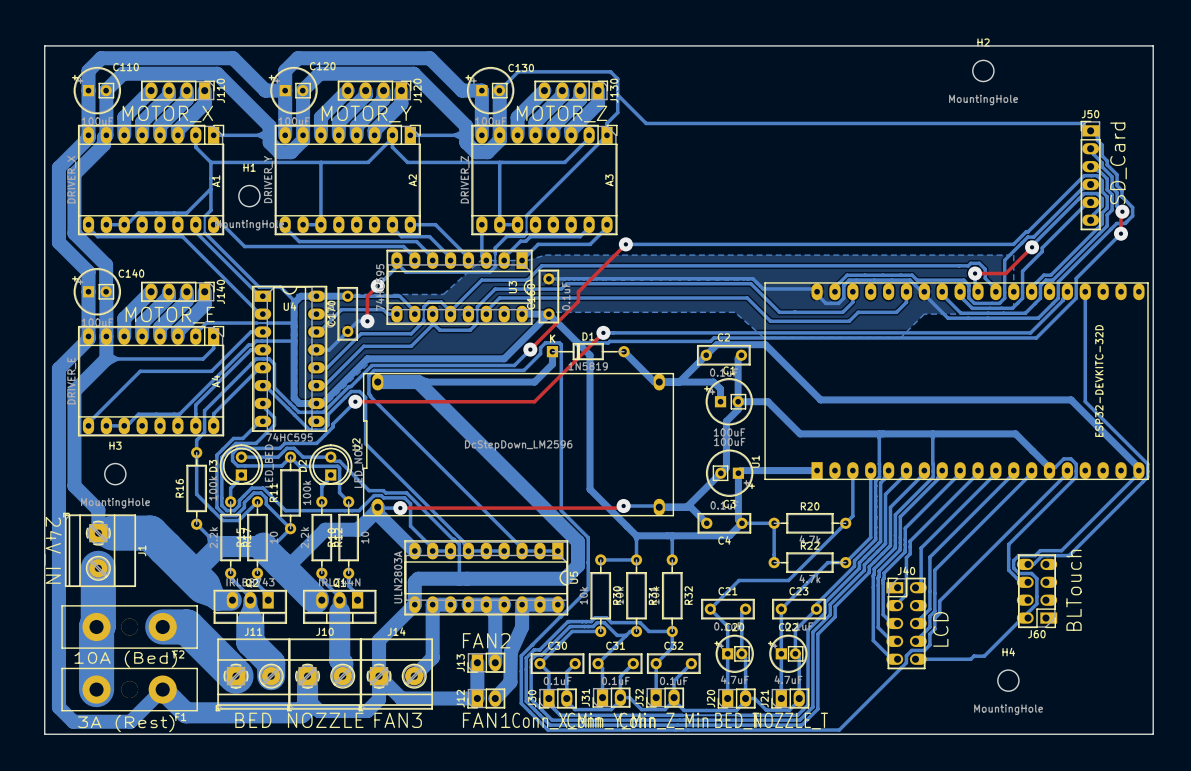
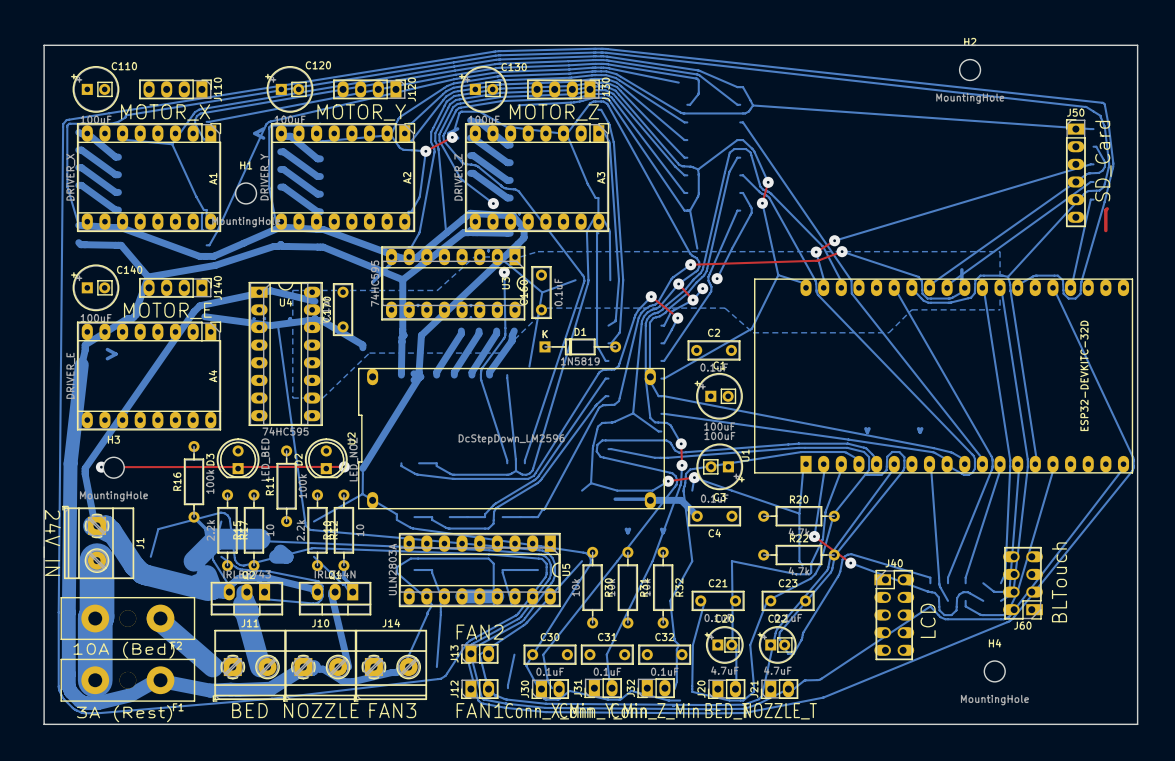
bottom track: none -> (568, 61) (496, 63) (200, 113) (196, 116) (195, 124) (203, 139) (206, 139)
bottom track: none -> (568, 61) (606, 60) (697, 74) (737, 104) (740, 104)
bottom track: none -> (453, 62) (126, 115) (118, 121) (111, 123) (69, 123) (67, 125) (67, 185) (78, 225) (121, 227) (199, 256) (213, 256) (280, 227) (323, 229) (401, 258) (416, 257) (470, 213) (513, 215) (523, 228) (523, 238) (421, 335) (419, 377) (362, 468) (362, 494)
bottom track: none -> (453, 62) (498, 55) (606, 52) (1085, 106)
bottom track: none -> (678, 82) (603, 67) (499, 72) (454, 79) (269, 121) (217, 231) (209, 245) (206, 245)
bottom track: (151, 90) (124, 117) (124, 135) -> none
bottom track: (168, 90) (168, 95) (142, 122) (142, 135) -> none
bottom track: (186, 90) (186, 99) (160, 126) (160, 135) -> none
bottom track: (204, 90) (204, 103) (177, 130) (177, 135) -> none
bottom track: (285, 90) (265, 90) (233, 58) (101, 58) (88, 70) (88, 138) (58, 167) (58, 242) (88, 272) (88, 339) (58, 368) (58, 707) (73, 721) (130, 721) (162, 689) (185, 712) (301, 712) (307, 706) (307, 676) (307, 699) (319, 711) (367, 711) (379, 699) (379, 640) (414, 604) (414, 582) (418, 578) (564, 578) (578, 565) (578, 541) (418, 382) -> none
bottom track: (347, 90) (320, 117) (320, 135) -> none
bottom track: (365, 90) (365, 95) (338, 122) (338, 135) -> none
bottom track: (383, 90) (383, 99) (356, 126) (356, 135) -> none
bottom track: (401, 90) (401, 103) (374, 130) (374, 135) -> none
bottom track: (544, 90) (517, 117) (517, 135) -> none
bottom track: (562, 90) (562, 95) (535, 122) (535, 135) -> none
bottom track: (580, 90) (580, 99) (553, 126) (553, 135) -> none
bottom track: (598, 90) (598, 103) (571, 130) (571, 135) -> none
bottom track: (617, 95) (646, 123) (1082, 123) (1083, 126) (1097, 134) (1097, 140) (1102, 145) (1102, 155) (1107, 160) (1107, 164) (1117, 174) (1117, 185) (1121, 190) (1121, 196) (1132, 207) (1132, 215) (1125, 223) (1116, 223) (1058, 281) (1058, 298) (1038, 318) (947, 318) (924, 294) (924, 288) (918, 288) (910, 280) (849, 280) (843, 285) (843, 298) (838, 303) (825, 303) (817, 294) (817, 288) (763, 288) (752, 278) (548, 278) -> none
bottom track: none -> (501, 101) (459, 107) (443, 135) (443, 140) (462, 162) (477, 166) (501, 185)
bottom track: none -> (501, 101) (572, 98) (594, 93) (604, 93) (611, 97) (684, 192) (687, 192)
bottom track: none -> (518, 105) (573, 102) (594, 97) (604, 97) (609, 100) (684, 210) (690, 210)
bottom track: none -> (687, 104) (690, 104) (698, 94) (697, 78) (606, 64) (592, 63) (497, 68) (206, 121)
bottom track: none -> (753, 105) (745, 113) (683, 113) (616, 74) (606, 71) (500, 76) (447, 85) (400, 117) (390, 135)
bottom track: none -> (753, 105) (743, 87) (737, 87) (698, 70) (603, 56) (498, 59) (199, 109) (194, 112) (172, 144)
bottom track: none -> (753, 105) (1093, 129)
bottom track: none -> (1085, 106) (1100, 117)
bottom track: none -> (598, 109) (601, 109) (609, 123) (613, 143) (623, 279) (619, 331) (611, 343) (608, 343)
bottom track: none -> (1100, 117) (1104, 127) (1109, 163) (1104, 186) (1099, 190) (1085, 192) (1007, 276)
bottom track: none -> (470, 120) (480, 122) (507, 145) (510, 145)
bottom track: none -> (687, 122) (615, 77) (606, 75) (594, 75) (500, 80) (453, 87) (446, 91) (411, 123) (408, 123)
bottom track: none -> (740, 122) (743, 122) (851, 280) (851, 293) (983, 460) (983, 463)
bottom track: none -> (320, 123) (313, 125) (271, 125) (269, 127) (269, 187) (277, 228)
bottom track: none -> (598, 127) (601, 127) (609, 143) (618, 279) (615, 320)
bottom track: none -> (78, 132) (88, 134) (115, 157) (118, 157)
bottom track: (106, 135) (106, 90) (123, 73) (217, 73) (269, 126) (269, 142) (279, 152) (291, 152) (303, 140) (302, 90) (319, 73) (413, 73) (466, 126) (466, 142) (476, 152) (487, 152) (499, 140) (499, 90) (518, 71) (610, 71) (617, 79) (617, 112) (607, 123) (607, 135) (526, 215) (526, 233) (523, 236) (506, 236) (495, 247) (495, 266) (489, 272) (405, 272) (396, 263) (396, 260) -> none
bottom track: (106, 135) (104, 137) (104, 144) (74, 174) (74, 233) (106, 265) (106, 291) -> none
bottom track: (195, 135) (195, 147) (210, 162) -> none
bottom track: (213, 135) (269, 135) -> none
bottom track: (285, 135) (285, 70) (297, 58) (429, 58) (462, 90) (481, 90) (481, 135) -> none
bottom track: (392, 135) (392, 147) (407, 162) (564, 162) (589, 138) (589, 135) -> none
bottom track: (410, 135) (466, 135) -> none
bottom track: none -> (280, 134) (290, 136) (317, 158) (320, 158)
bottom track: none -> (390, 135) (403, 149) (425, 151) (419, 196) (411, 211) (408, 211) (408, 229)
bottom track: none -> (390, 135) (320, 141)
bottom track: none -> (566, 134) (587, 184) (595, 197) (598, 197) (598, 215)
bottom track: none -> (566, 134) (507, 127) (480, 111) (461, 111) (452, 137)
bottom track: none -> (566, 134) (590, 103) (603, 101) (607, 103) (690, 253) (699, 261) (697, 270) (678, 284) (661, 304)
bottom track: (392, 138) (368, 162) (210, 162) -> none
top track: none -> (452, 137) (425, 151)
via: none -> (452, 137)
bottom track: none -> (470, 138) (510, 162)
bottom track: none -> (118, 139) (172, 144)
bottom track: none -> (687, 140) (684, 140) (616, 82) (606, 78) (594, 78) (570, 81) (500, 84) (453, 91) (446, 96) (411, 141) (408, 141)
bottom track: none -> (172, 144) (196, 196) (203, 210) (206, 210) (206, 227)
bottom track: (1090, 148) (1093, 148) (1093, 154) (1112, 176) (1112, 187) (1117, 192) (1117, 206) (1122, 211) -> none
bottom track: none -> (1093, 146) (1096, 146) (1104, 162) (1102, 170) (1086, 174) (931, 284) (931, 287)
bottom track: none -> (78, 150) (118, 174)
bottom track: none -> (280, 151) (320, 176)
via: none -> (425, 151)
bottom track: none -> (470, 155) (510, 180)
bottom track: none -> (687, 157) (684, 157) (616, 87) (606, 82) (500, 88) (454, 96) (446, 101) (431, 132) (431, 142) (434, 151) (419, 231) (411, 247) (408, 247)
bottom track: none -> (740, 157) (737, 157) (729, 172) (706, 271) (687, 293) (665, 312) (653, 318) (649, 322) (649, 379) (658, 396) (934, 448) (952, 452) (966, 460) (966, 463)
bottom track: (210, 162) (210, 210) (204, 216) -> none
bottom track: (321, 162) (320, 224) (303, 224) -> none
bottom track: (499, 162) (499, 224) (517, 224) (517, 221) -> none
bottom track: (1090, 166) (1099, 170) (1107, 178) (1107, 189) (1112, 194) (1112, 210) (1107, 215) (1107, 225) (1052, 280) (1045, 280) (1040, 285) (1040, 298) (1025, 313) (960, 313) (942, 294) (942, 291) -> none
bottom track: none -> (1093, 164) (834, 240)
bottom track: none -> (78, 167) (118, 192)
bottom track: none -> (280, 169) (320, 194)
bottom track: none -> (698, 169) (698, 194) (690, 210)
bottom track: none -> (698, 169) (737, 140) (743, 140) (754, 151) (768, 182)
bottom track: none -> (698, 169) (679, 164) (615, 90) (606, 86) (571, 90) (501, 92) (456, 99) (449, 104) (435, 133) (446, 232)
bottom track: none -> (470, 173) (510, 197)
bottom track: none -> (687, 175) (684, 175) (674, 166) (613, 93) (605, 90) (571, 94) (501, 96) (457, 103) (453, 107) (439, 134) (439, 140) (460, 178) (493, 203)
bottom track: none -> (740, 175) (743, 175) (760, 192) (769, 197) (815, 280) (817, 294) (973, 455) (974, 468) (968, 474) (964, 474) (948, 466) (948, 460) (933, 452) (848, 439)
top track: none -> (768, 182) (762, 203)
via: none -> (768, 182)
bottom track: (1090, 184) (1082, 188) (1033, 237) (1027, 237) (1004, 260) (1004, 298) (999, 303) (974, 303) (968, 297) (968, 285) (963, 280) (917, 280) (912, 275) (847, 275) (834, 287) (834, 291) -> none
bottom track: none -> (1093, 181) (1090, 181) (948, 284) (948, 287)
bottom track: none -> (78, 185) (118, 210)
bottom track: none -> (501, 185) (518, 191) (583, 276) (584, 280) (524, 463)
bottom track: (210, 189) (186, 213) (138, 213) (129, 221) (124, 221) (124, 224) (106, 224) -> none
bottom track: none -> (280, 187) (320, 211)
bottom track: none -> (740, 192) (743, 192) (751, 208) (751, 212) (717, 278)
bottom track: (1090, 202) (1087, 202) (1042, 247) (1042, 251) (1022, 271) (1022, 298) (1012, 308) (972, 308) (960, 296) (960, 291) -> none
bottom track: none -> (1093, 199) (1090, 199) (1072, 287)
via: none -> (493, 203)
bottom track: none -> (762, 203) (778, 275)
via: none -> (762, 203)
via: (1122, 211) -> none
bottom track: none -> (690, 210) (697, 248)
bottom track: none -> (740, 210) (737, 210) (708, 276) (711, 291) (664, 360) (661, 360)
bottom track: (1090, 220) (1093, 220) (1093, 214) (1102, 206) (1102, 198) (1097, 193) (1084, 193) (1032, 247) -> none
bottom track: (88, 224) (88, 227) (97, 236) (182, 236) (260, 314) (262, 314) -> none
bottom track: (195, 224) (195, 232) (260, 296) (262, 296) -> none
bottom track: (213, 224) (222, 224) (244, 246) (403, 246) (414, 257) (414, 260) -> none
bottom track: (285, 224) (285, 227) (299, 241) (416, 241) (432, 257) (432, 260) -> none
bottom track: (392, 224) (392, 227) (401, 236) (429, 236) (450, 257) (450, 260) -> none
bottom track: (410, 224) (435, 224) (468, 257) (468, 260) -> none
bottom track: (481, 224) (481, 256) (486, 260) -> none
bottom track: (589, 224) (589, 227) (579, 236) (530, 236) (525, 241) (520, 241) (504, 257) (504, 260) -> none
bottom track: (607, 224) (607, 227) (590, 244) (538, 244) (522, 260) -> none
bottom track: (204, 233) (259, 287) (280, 287) (294, 303) -> none
bottom track: (1120, 233) (1076, 278) (1076, 298) (1036, 337) (714, 337) (710, 341) (577, 342) -> none
via: (1120, 233) -> none
bottom track: none -> (510, 233) (472, 232) (470, 230) (463, 232) (402, 279)
bottom track: none -> (598, 233) (597, 344) (605, 360) (608, 360)
bottom track: (625, 244) (1013, 244) (1084, 175) (1097, 175) (1102, 180) (1102, 191) (1107, 196) (1107, 208) (1102, 212) (1102, 223) (1050, 275) (1043, 275) (1031, 287) (1031, 291) -> none
top track: (625, 244) (578, 291) (578, 301) (530, 349) -> none
via: (625, 244) -> none
top track: none -> (834, 240) (816, 252)
via: none -> (834, 240)
bottom track: none -> (78, 242) (80, 244) (121, 245) (148, 277)
top track: (1032, 247) (1005, 273) (975, 273) -> none
via: (1032, 247) -> none
bottom track: none -> (816, 252) (825, 287)
via: none -> (816, 252)
bottom track: none -> (842, 251) (918, 276) (921, 281) (922, 293) (927, 298) (951, 297) (966, 289) (966, 287)
top track: none -> (842, 251) (817, 260) (690, 264)
via: none -> (842, 251)
bottom track: none -> (501, 259) (542, 292)
bottom track: none -> (690, 264) (671, 278) (657, 302) (641, 312) (619, 401) (614, 404) (603, 405) (599, 407) (544, 509) (537, 517) (502, 517)
via: none -> (690, 264)
via: (975, 273) -> none
bottom track: none -> (504, 272) (505, 335) (482, 368) (480, 378) (507, 463)
via: none -> (504, 272)
bottom track: none -> (778, 275) (807, 284) (807, 287)
bottom track: none -> (778, 275) (751, 328) (661, 378)
bottom track: none -> (148, 277) (136, 314) (85, 345) (81, 364) (70, 463) (68, 612) (68, 686) (71, 692) (79, 700) (85, 703) (97, 703) (130, 695) (156, 680) (210, 690) (238, 690) (270, 688) (302, 669) (311, 669) (313, 667) (322, 669) (343, 681) (353, 681) (396, 672) (407, 659) (432, 605) (427, 597) (396, 572) (396, 567) (410, 558) (488, 558) (493, 563) (493, 605)
bottom track: none -> (148, 277) (215, 265) (280, 244) (282, 246) (323, 247) (402, 279)
bottom track: none -> (1007, 276) (980, 275) (975, 280) (974, 293) (971, 297) (949, 302) (928, 302) (923, 300) (913, 289) (913, 287)
bottom track: none -> (1007, 276) (1036, 463)
via: none -> (717, 278)
bottom track: none -> (402, 279) (404, 335) (401, 337) (401, 375)
bottom track: none -> (575, 280) (542, 292)
bottom track: none -> (610, 280) (609, 232) (601, 215) (595, 215) (586, 232) (588, 282) (532, 470) (526, 474) (515, 470)
top track: (377, 286) (367, 296) (367, 321) -> none
via: (377, 286) -> none
top track: none -> (678, 284) (693, 300)
via: none -> (678, 284)
bottom track: (106, 291) (106, 358) -> none
bottom track: (151, 291) (124, 318) (124, 336) -> none
bottom track: (168, 291) (168, 296) (142, 323) (142, 336) -> none
bottom track: (186, 291) (186, 300) (160, 327) (160, 336) -> none
bottom track: (204, 291) (204, 304) (177, 331) (177, 336) -> none
bottom track: (852, 291) (852, 302) (842, 312) (779, 312) (750, 283) (566, 283) (561, 289) (495, 289) (477, 306) (477, 323) (470, 330) (439, 330) (432, 323) -> none
bottom track: none -> (842, 287) (822, 246) (770, 193) (760, 186) (750, 152) (745, 149) (734, 149) (729, 152) (702, 269) (684, 290) (662, 309) (649, 316) (645, 323) (645, 378) (650, 418) (655, 422) (666, 422) (670, 425) (681, 443)
bottom track: (906, 291) (906, 302) (896, 312) (858, 312) (849, 321) (770, 321) (747, 298) (499, 298) (486, 311) (486, 314) -> none
bottom track: none -> (895, 287) (992, 459) (992, 468) (948, 577) (948, 583)
bottom track: (995, 291) (995, 288) (985, 278) (985, 269) (979, 263) (970, 263) (968, 265) (541, 265) (527, 280) (481, 280) (450, 311) (441, 302) (428, 302) (423, 306) (423, 321) (411, 333) (361, 333) (327, 367) (316, 367) -> none
bottom track: none -> (983, 287) (1010, 460) (1005, 572)
bottom track: none -> (1001, 287) (1027, 466) (1013, 591) (1000, 600)
bottom track: none -> (1019, 287) (1019, 284) (1033, 276) (1057, 275) (1062, 280) (1063, 293) (1068, 298) (1075, 298) (1080, 293) (1081, 282) (1113, 166) (1108, 126) (1103, 102) (594, 48) (495, 51) (66, 120) (63, 124) (58, 612)
bottom track: (1067, 291) (1063, 300) (1030, 332) (603, 332) -> none
bottom track: none -> (1054, 287) (1133, 457) (1132, 470) (1009, 621) (823, 697) (743, 713) (545, 712) (481, 703) (478, 700) (466, 655) (468, 647) (520, 616) (549, 578) (550, 564) (545, 556) (541, 554) (488, 550) (253, 540)
bottom track: (1085, 291) (1085, 401) (1147, 464) (1147, 477) (1069, 555) (1042, 555) (1033, 564) (1028, 564) -> none
bottom track: none -> (702, 288) (693, 300) (672, 311) (664, 325) (661, 325)
via: none -> (702, 288)
bottom track: none -> (542, 292) (529, 366)
bottom track: none -> (651, 296) (635, 315) (618, 366) (614, 369) (599, 372) (533, 475) (528, 478) (453, 478) (417, 474) (401, 466) (401, 463)
top track: none -> (651, 296) (672, 313)
via: none -> (651, 296)
bottom track: (294, 303) (300, 296) (399, 296) (414, 311) (414, 314) -> none
bottom track: (294, 303) (294, 398) (299, 403) (322, 403) (367, 358) (504, 358) (548, 314) -> none
via: none -> (693, 300)
bottom track: none -> (315, 301) (270, 290) (200, 305) (194, 311) (85, 468) (93, 525) (97, 525)
bottom track: none -> (661, 304) (647, 312) (641, 321) (633, 413)
bottom track: (432, 311) (432, 324) (411, 346) (363, 346) (324, 385) (316, 385) -> none
bottom track: (396, 314) (387, 314) (383, 309) (341, 309) (319, 331) (316, 331) -> none
bottom track: (522, 314) (548, 314) -> none
bottom track: (548, 314) (590, 355) (590, 489) (636, 535) -> none
bottom track: none -> (204, 316) (270, 325) (312, 320) (315, 318) (321, 320) (362, 345) (362, 347)
bottom track: (367, 321) (357, 321) (329, 349) (316, 349) -> none
via: (367, 321) -> none
bottom track: none -> (677, 318) (664, 343) (661, 343)
via: none -> (677, 318)
bottom track: (293, 323) (206, 323) (195, 333) (195, 336) -> none
bottom track: none -> (615, 320) (608, 325)
bottom track: none -> (277, 324) (305, 525) (310, 529) (542, 550) (552, 558) (554, 564) (553, 580) (524, 619) (472, 648) (470, 653) (481, 698) (505, 703) (546, 707) (744, 708) (788, 689) (793, 689) (804, 680) (820, 679) (930, 606) (940, 617) (945, 619) (1003, 619) (1009, 616) (1125, 466) (1125, 463)
bottom track: (262, 331) (250, 331) (211, 371) (140, 371) (88, 423) (88, 425) -> none
top track: (603, 332) (534, 401) (355, 401) -> none
via: (603, 332) -> none
bottom track: none -> (461, 331) (436, 375)
bottom track: none -> (479, 331) (454, 375)
bottom track: none -> (496, 331) (471, 375)
bottom track: none -> (514, 331) (512, 340) (489, 372) (489, 375)
bottom track: (213, 336) (213, 348) (203, 358) (106, 358) -> none
bottom track: (294, 341) (256, 341) (252, 344) (248, 344) (179, 414) (138, 414) (129, 423) (124, 423) (124, 425) (106, 425) -> none
bottom track: (262, 349) (250, 349) (195, 404) (195, 425) -> none
bottom track: (530, 349) (514, 365) (372, 365) (323, 412) (298, 412) (274, 387) (274, 364) (269, 358) (256, 358) (204, 410) (204, 432) (196, 440) (196, 494) (222, 520) (238, 520) (257, 501) -> none
via: (530, 349) -> none
bottom track: (552, 351) (552, 364) (534, 382) (418, 382) -> none
bottom track: (623, 351) (654, 382) (713, 382) (720, 389) (720, 401) -> none
bottom track: (741, 355) (738, 358) (738, 409) (726, 421) (726, 467) (686, 507) -> none
bottom track: (106, 358) (74, 390) (74, 485) (98, 509) (98, 533) (110, 526) -> none
bottom track: (262, 367) (259, 367) (213, 413) (213, 425) -> none
bottom track: none -> (507, 375) (515, 470)
bottom track: (378, 382) (418, 382) -> none
bottom track: (679, 382) (716, 344) (765, 344) (820, 399) (1071, 399) (1138, 467) (1138, 473) (1061, 550) (1040, 550) (1035, 555) (1018, 555) (1013, 560) (1013, 568) (1019, 573) (1031, 573) (1036, 578) (1036, 603) (1028, 612) (1028, 618) (1022, 618) (984, 656) (973, 656) (970, 659) (915, 659) -> none
bottom track: none -> (608, 378) (605, 378) (535, 479) (495, 503) (485, 514) (485, 517) (449, 517)
bottom track: (262, 385) (265, 385) (309, 430) (322, 430) (328, 425) (328, 414) (351, 391) (359, 391) (365, 397) (365, 443) (464, 542) (468, 551) (504, 551) -> none
bottom track: (355, 401) (316, 443) (284, 443) (279, 448) (237, 448) (232, 453) (232, 460) (237, 465) (281, 465) (290, 457) (299, 466) (337, 466) (339, 468) (339, 492) (348, 501) -> none
via: (355, 401) -> none
bottom track: none -> (608, 396) (605, 396) (595, 405) (540, 480) (496, 508) (494, 511) (493, 523) (488, 528) (448, 528) (432, 519) (432, 517) (414, 517)
bottom track: (738, 401) (767, 401) (800, 433) (1015, 433) (1049, 467) (1049, 470) -> none
bottom track: (262, 403) (265, 403) (265, 408) (274, 417) (274, 425) (256, 443) (235, 443) (221, 457) (221, 505) (227, 510) (234, 510) (239, 505) (239, 500) (251, 488) (263, 488) (285, 510) (359, 510) (374, 495) (381, 495) (383, 497) (404, 497) (410, 503) (410, 526) (432, 548) (432, 551) (450, 551) -> none
bottom track: none -> (633, 413) (614, 422) (602, 422) (597, 426) (592, 447) (591, 483)
bottom track: none -> (633, 413) (661, 431)
bottom track: none -> (661, 413) (848, 439)
bottom track: (262, 421) (260, 421) (242, 438) (233, 438) (216, 455) (216, 507) (224, 515) (236, 515) (244, 507) (244, 502) (253, 493) (261, 493) (266, 498) (266, 504) (290, 528) (272, 546) (263, 546) (263, 548) (315, 599) (321, 600) -> none
bottom track: (879, 433) (879, 477) (875, 480) (875, 539) (854, 560) (854, 566) (816, 604) (816, 609) (795, 630) (795, 653) (799, 657) (799, 700) (789, 710) (766, 710) (754, 698) (745, 698) -> none
bottom track: (932, 433) (933, 477) (895, 514) (895, 547) (874, 568) (873, 640) (891, 659) (897, 659) -> none
top track: none -> (681, 443) (682, 465)
via: none -> (681, 443)
bottom track: none -> (798, 443) (679, 452) (666, 440) (602, 440) (597, 444) (596, 451) (600, 456) (672, 473) (675, 476) (676, 484) (543, 654) (547, 680) (552, 688)
bottom track: none -> (798, 443) (847, 443) (865, 447) (878, 460) (878, 463)
bottom track: none -> (608, 449) (655, 457) (667, 457) (798, 447) (847, 447) (864, 452) (869, 457) (869, 469) (834, 513) (819, 565) (815, 574) (811, 578) (767, 600) (750, 644) (754, 691) (743, 700) (729, 700) (692, 691) (692, 644) (704, 600)
bottom track: (241, 457) (278, 457) (286, 448) (294, 448) (302, 457) (330, 457) (334, 461) (339, 461) (369, 490) (406, 492) (459, 544) (459, 578) -> none
bottom track: none -> (801, 452) (843, 452) (860, 460) (860, 463)
bottom track: none -> (801, 452) (690, 469) (686, 473) (683, 490) (692, 561) (670, 600) (674, 639)
bottom track: (1049, 467) (1055, 467) (1063, 458) (1071, 458) (1076, 464) (1076, 477) (1008, 544) (1008, 570) (1020, 582) (1028, 582) -> none
bottom track: none -> (419, 463) (436, 463) (436, 466) (453, 474) (508, 474) (515, 470)
bottom track: none -> (825, 463) (814, 536)
bottom track: none -> (842, 463) (825, 511) (822, 539) (811, 562) (809, 574) (796, 574) (731, 561) (732, 640) (736, 644) (736, 689)
bottom track: none -> (895, 463) (895, 466) (832, 552) (827, 570) (777, 629) (762, 695) (759, 699) (743, 704) (546, 703) (506, 699) (496, 695)
bottom track: none -> (931, 463) (939, 584) (948, 600)
bottom track: none -> (1001, 463) (965, 577) (965, 583)
bottom track: none -> (1019, 463) (1009, 590) (994, 591) (983, 583)
bottom track: none -> (1054, 463) (1017, 592) (1007, 612) (1003, 615) (979, 614) (965, 606) (965, 600)
bottom track: (817, 470) (741, 470) (738, 473) (738, 519) (741, 523) -> none
bottom track: (852, 470) (852, 516) (788, 580) (738, 580) (710, 609) (727, 626) (727, 698) -> none
bottom track: (870, 470) (870, 537) (845, 562) (827, 562) (781, 609) (781, 698) -> none
bottom track: (888, 470) (888, 473) (880, 482) (880, 541) (859, 562) (859, 568) (825, 602) (825, 612) (808, 630) (808, 704) (797, 715) (560, 715) (552, 707) (548, 698) (548, 672) (539, 663) (572, 631) (600, 631) -> none
bottom track: (906, 470) (906, 473) (885, 494) (885, 543) (864, 564) (864, 570) (830, 604) (830, 614) (812, 632) (812, 707) (799, 720) (552, 720) (531, 699) (531, 660) (536, 654) (541, 654) (570, 626) (593, 626) (597, 622) (604, 622) (617, 635) (625, 635) -> none
bottom track: (924, 470) (924, 473) (890, 507) (890, 545) (869, 566) (869, 572) (835, 606) (835, 616) (817, 634) (817, 709) (801, 725) (549, 725) (526, 701) (526, 657) (534, 649) (539, 649) (568, 621) (591, 621) (595, 617) (606, 617) (611, 622) (640, 622) (648, 631) (672, 631) (672, 647) (656, 663) (656, 697) -> none
bottom track: (942, 470) (938, 479) (900, 516) (900, 549) (879, 571) (878, 627) (891, 641) (897, 641) -> none
bottom track: (960, 470) (960, 473) (905, 528) (905, 551) (884, 573) (883, 614) (891, 623) (897, 623) -> none
bottom track: (978, 470) (978, 473) (910, 541) (910, 553) (906, 557) (906, 594) (897, 605) -> none
bottom track: (995, 470) (995, 473) (921, 548) (921, 587) (915, 587) -> none
bottom track: (1013, 470) (1013, 473) (929, 557) (929, 609) (921, 618) (921, 623) (915, 623) -> none
bottom track: (1031, 470) (1031, 473) (934, 570) (934, 611) (929, 616) (929, 627) (921, 635) (921, 641) (915, 641) -> none
bottom track: (1067, 470) (1067, 473) (939, 600) (939, 613) (934, 618) (934, 629) (929, 634) (929, 645) (924, 650) (911, 650) (906, 655) (906, 662) (839, 730) (547, 730) (521, 703) (521, 655) (588, 589) (588, 537) (561, 510) (561, 344) (559, 342) (545, 342) (540, 347) (540, 353) (523, 370) (374, 370) (368, 375) (370, 396) (522, 548) (522, 551) (557, 551) -> none
bottom track: none -> (682, 465) (680, 484) (652, 561) (606, 654) (609, 680) (613, 688)
via: none -> (682, 465)
via: none -> (101, 467)
top track: none -> (344, 466) (101, 467)
via: none -> (344, 466)
bottom track: (241, 475) (230, 488) (230, 501) -> none
bottom track: (330, 475) (321, 486) (321, 501) -> none
bottom track: none -> (803, 471) (799, 513)
bottom track: none -> (865, 474) (881, 474) (886, 470) (887, 456) (892, 451) (899, 452) (904, 457) (903, 470) (836, 554) (830, 572) (779, 632) (779, 638) (788, 653) (793, 653) (803, 632) (838, 575) (842, 559) (847, 554) (930, 577) (930, 583)
top track: none -> (694, 477) (668, 481)
via: none -> (694, 477)
bottom track: none -> (668, 481) (652, 490) (617, 490) (591, 483)
via: none -> (668, 481)
bottom track: none -> (591, 483) (582, 490)
bottom track: none -> (692, 490) (694, 477) (799, 513)
bottom track: none -> (362, 494) (396, 514) (396, 519) (412, 528) (585, 552) (589, 555) (590, 563) (535, 650)
bottom track: none -> (362, 494) (313, 521)
top track: (623, 506) (621, 508) (400, 508) -> none
via: (623, 506) -> none
bottom track: (400, 508) (377, 507) (377, 513) (414, 551) -> none
via: (400, 508) -> none
bottom track: (377, 510) (358, 529) (325, 529) (284, 569) -> none
bottom track: none -> (799, 513) (799, 561) (802, 565)
bottom track: (741, 523) (774, 523) (774, 562) -> none
bottom track: (741, 523) (729, 535) (636, 535) -> none
bottom track: none -> (221, 521) (212, 556) (229, 585)
bottom track: (107, 533) (150, 533) (217, 600) (232, 600) -> (106, 525) (134, 565) (141, 573)
bottom track: (636, 535) (636, 559) (600, 559) -> none
bottom track: (672, 535) (672, 559) -> none
top track: none -> (814, 536) (850, 563)
via: none -> (814, 536)
bottom track: none -> (150, 556) (158, 529) (220, 512) (224, 513) (229, 518) (235, 559) (240, 565) (313, 548) (488, 554) (542, 558) (546, 563) (546, 574) (517, 614) (469, 640) (445, 675) (440, 678) (271, 698) (98, 713) (83, 713) (75, 710) (63, 698) (59, 690) (58, 612)
bottom track: none -> (221, 556) (240, 569) (269, 571) (318, 581) (322, 586) (322, 596) (315, 603) (266, 599)
bottom track: none -> (313, 556) (344, 584) (349, 592)
bottom track: none -> (582, 561) (526, 623) (479, 654) (485, 680) (496, 695)
bottom track: none -> (850, 563) (934, 592) (938, 597) (939, 610) (944, 615) (951, 615) (956, 610) (957, 598) (963, 592) (967, 592) (983, 600)
via: none -> (850, 563)
bottom track: (230, 573) (230, 577) (250, 597) (250, 642) (271, 663) (271, 676) -> none
bottom track: (321, 573) (321, 579) (339, 597) (339, 660) (342, 663) (342, 676) -> none
bottom track: none -> (414, 570) (432, 570) (440, 595) (436, 667)
bottom track: none -> (537, 570) (502, 570) (511, 605)
bottom track: none -> (1005, 572) (1000, 583)
bottom track: none -> (145, 574) (207, 590) (225, 592) (225, 589) (239, 578) (268, 578) (313, 589) (313, 592)
bottom track: none -> (243, 592) (243, 604) (260, 667)
bottom track: none -> (331, 592) (348, 667)
bottom track: (450, 604) (432, 604) (432, 657) (414, 676) -> none
bottom track: (486, 604) (495, 613) (495, 662) -> none
bottom track: (557, 604) (522, 604) (522, 627) (510, 652) (510, 682) (495, 698) -> none
bottom track: (745, 609) (741, 612) (741, 653) (745, 657) (745, 701) (736, 710) (684, 710) (674, 700) -> none
bottom track: none -> (156, 618) (212, 666)
bottom track: (162, 627) (186, 627) (236, 676) -> none
bottom track: (636, 631) (630, 631) (598, 663) (602, 668) (602, 697) -> none
bottom track: none -> (674, 639) (679, 644) (676, 649) (676, 681) (674, 689)
bottom track: none -> (535, 650) (526, 665) (545, 699) (559, 699) (569, 690) (607, 699) (619, 699) (631, 690) (668, 700) (680, 700)
bottom track: (477, 662) (477, 698) (401, 698) (379, 676) -> none
bottom track: none -> (514, 654) (507, 688)
bottom track: (575, 663) (566, 672) (566, 701) (575, 709) (611, 709) (620, 700) (620, 676) (633, 663) -> none
bottom track: (691, 663) (674, 680) (674, 700) -> none
bottom track: (620, 697) (629, 697) (641, 709) (664, 709) (674, 700) -> none

